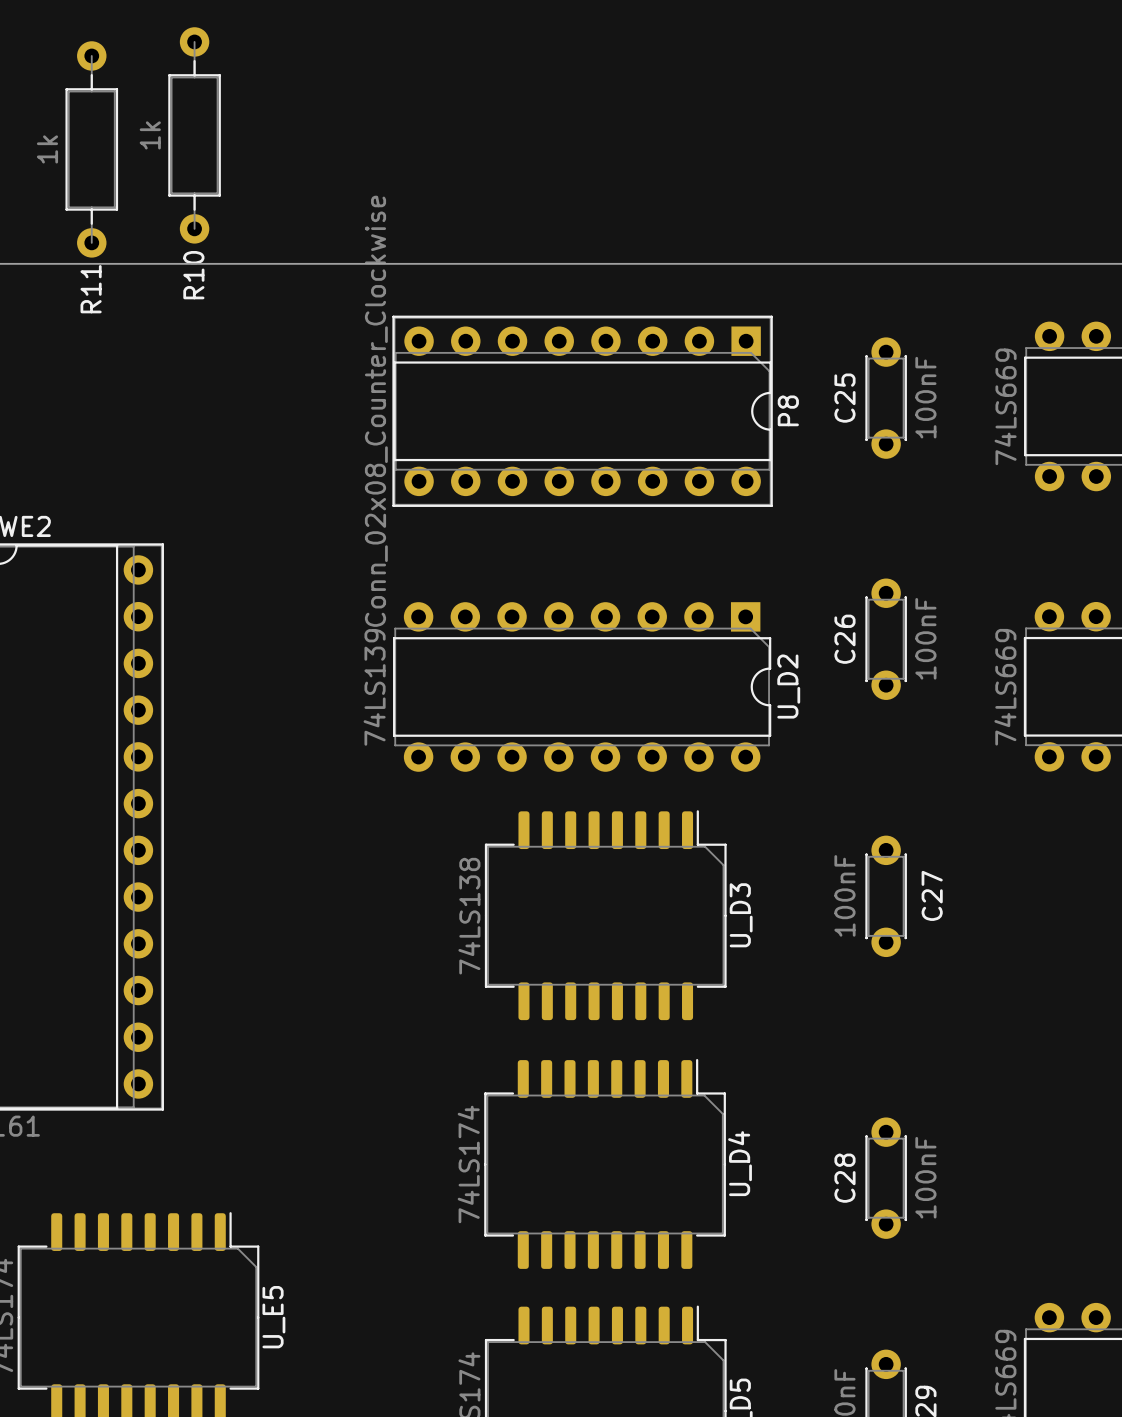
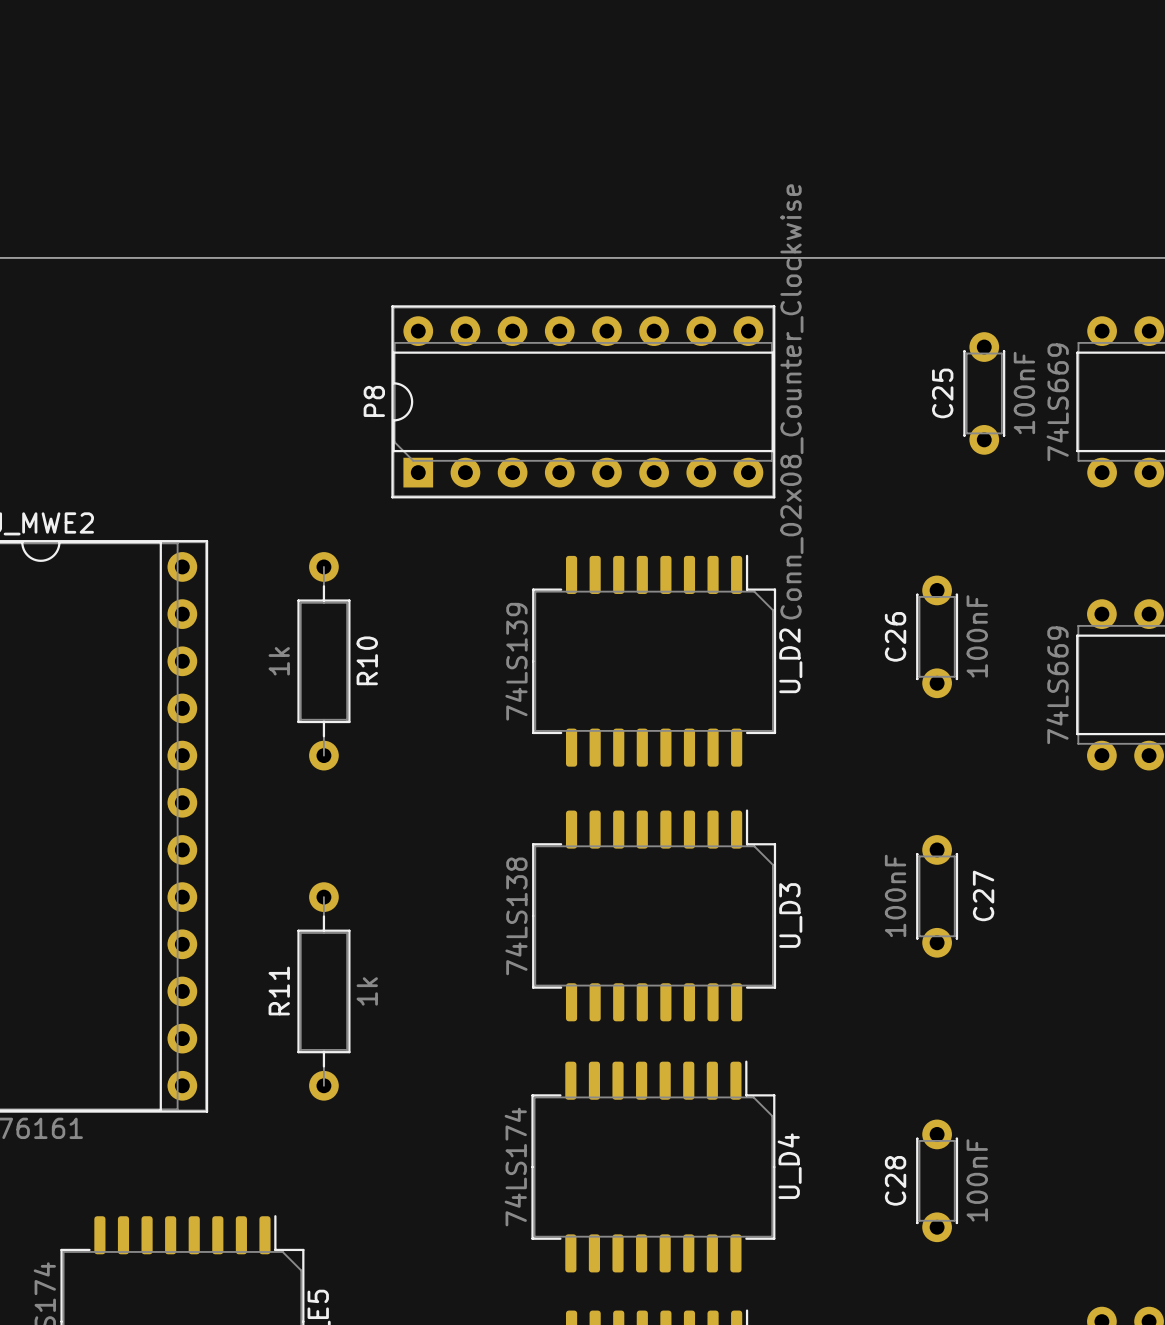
R10 position: (194, 135) -> (323, 661)
R11 value position: 1k (47, 149) -> 1k (367, 991)
R11 position: (91, 149) -> (323, 991)
R10 name position: R10 (193, 275) -> R10 (367, 660)
R11 name position: R11 (91, 289) -> R11 (279, 991)
C25 position: (886, 398) -> (984, 393)
P8 rotation: 0° (582, 411) -> 180° (583, 401)
U_D2 footprint: [393, 602, 772, 772] -> [532, 554, 777, 767]
U_D2 name position: U_D2 (788, 686) -> U_D2 (790, 660)
U_D2 value position: 74LS139 (374, 687) -> 74LS139 (516, 661)

